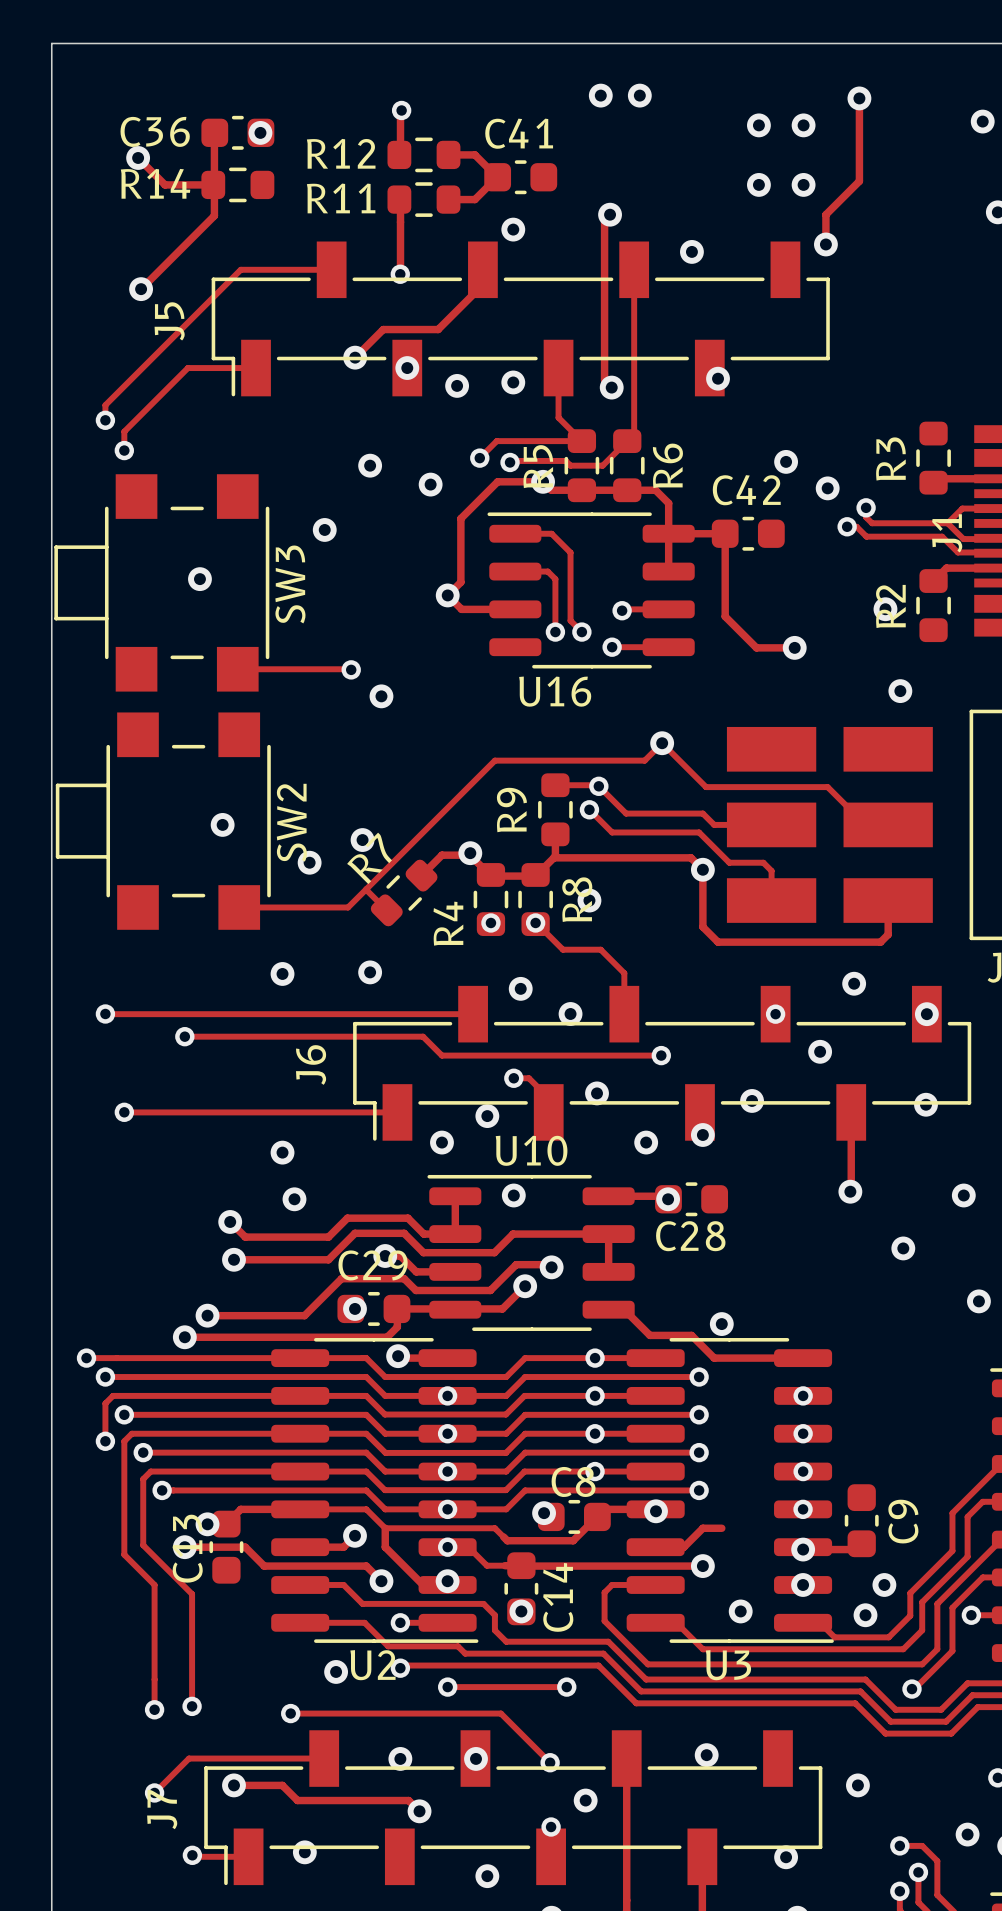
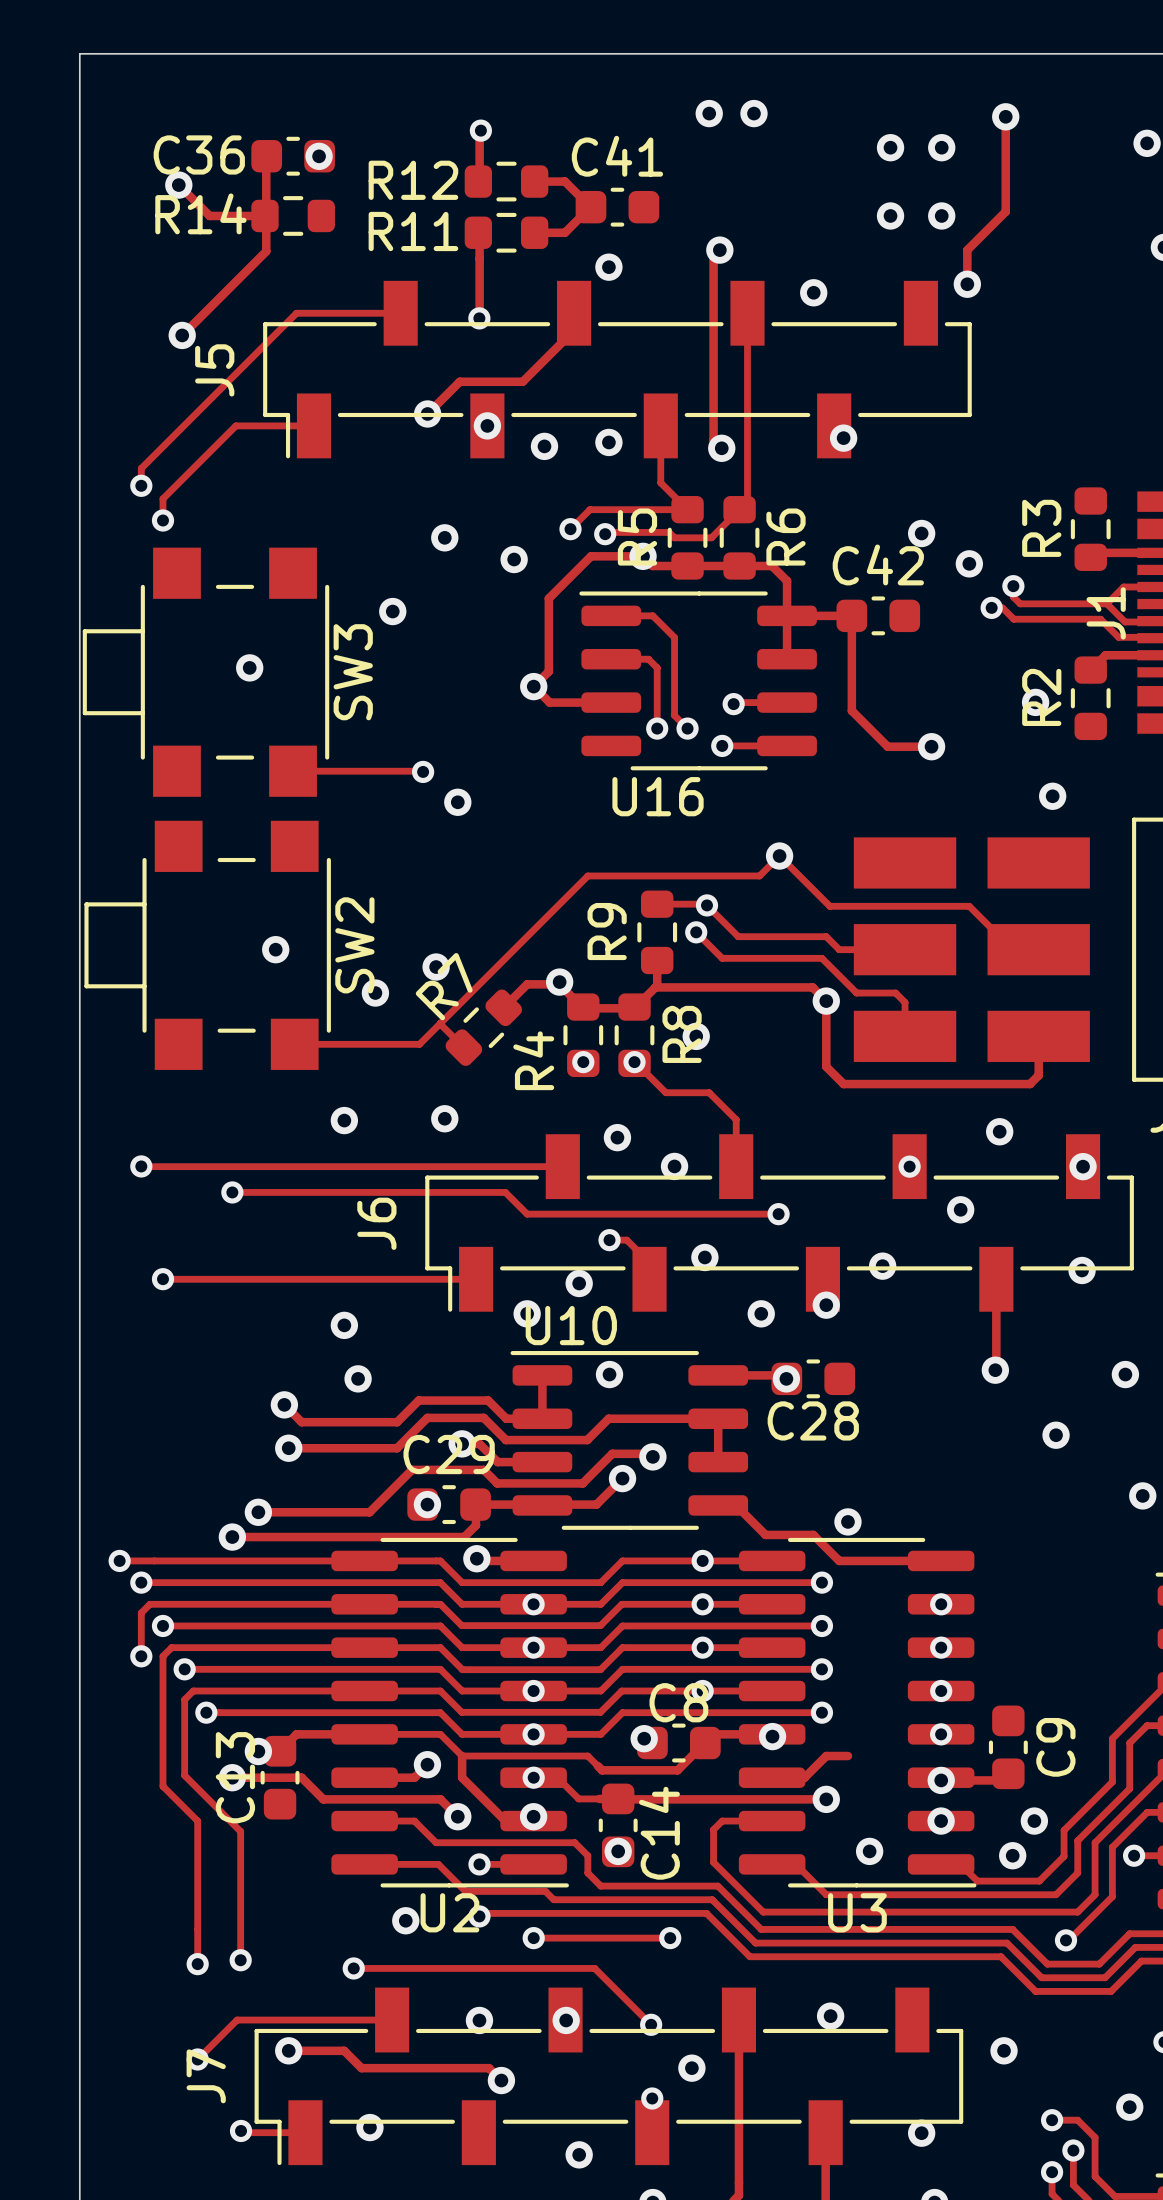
U10 name position: U10 (531, 1150) -> U10 (571, 1325)

